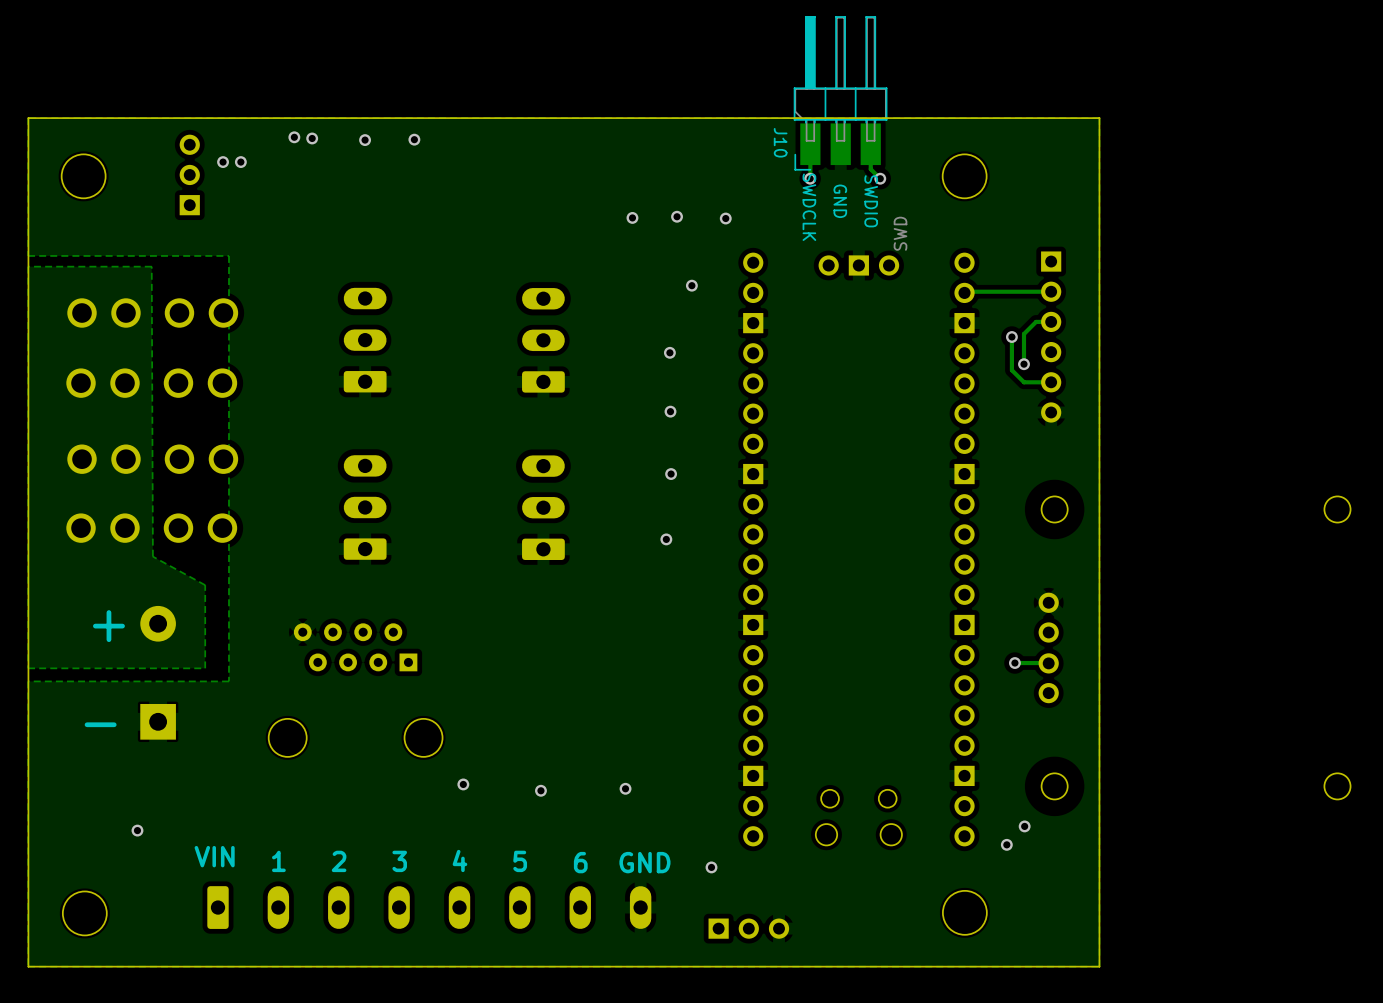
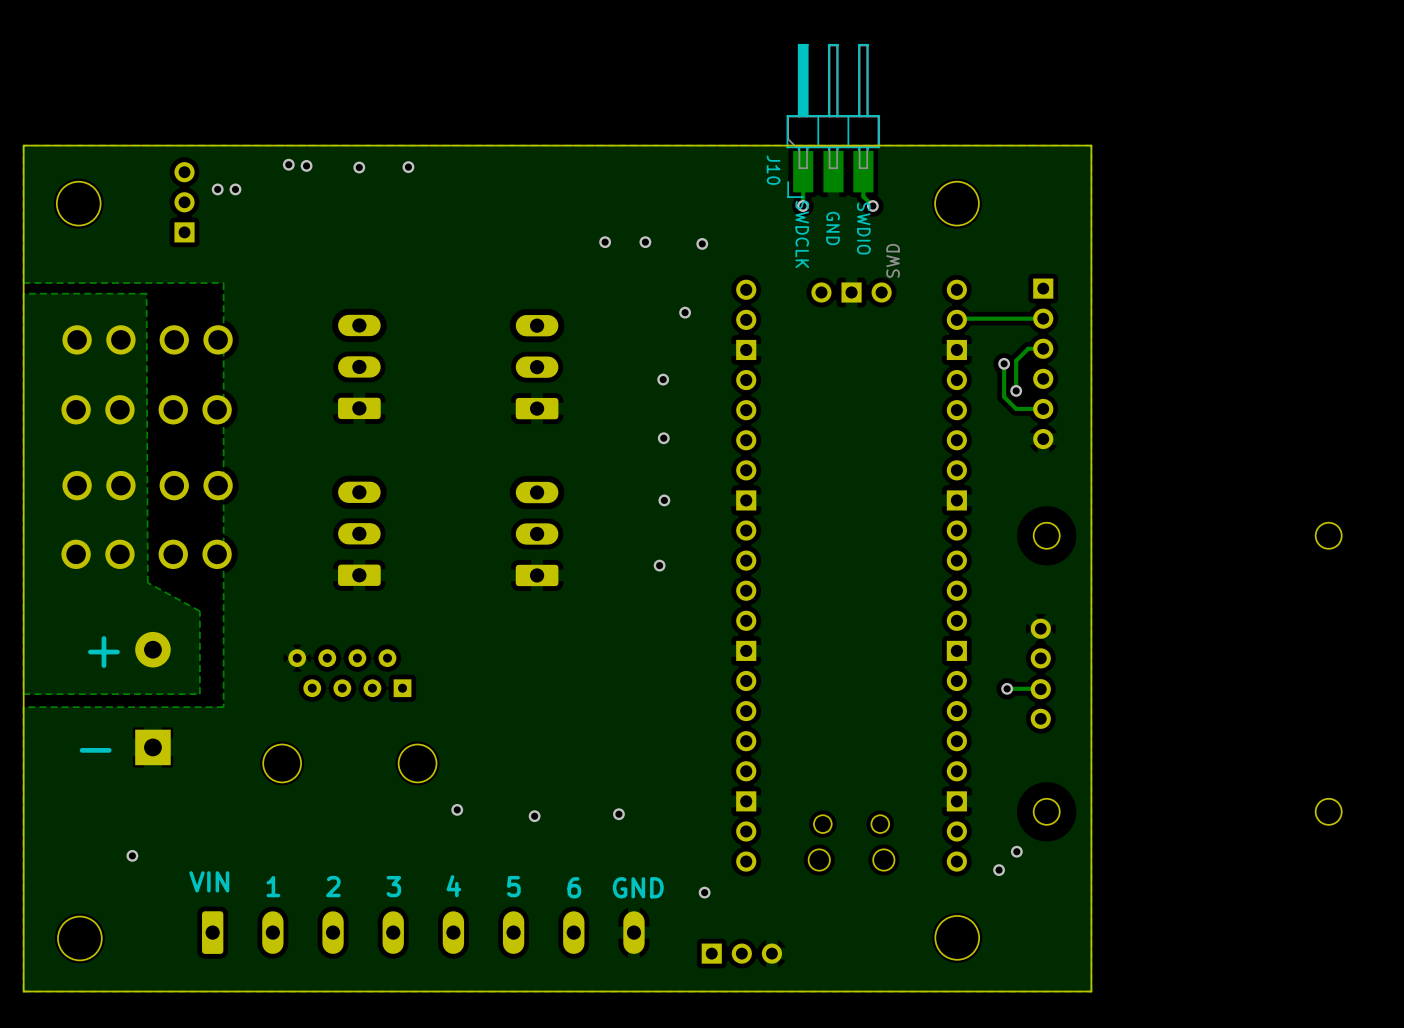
via: none -> (605, 242)
via: none -> (645, 242)
via: (677, 216) -> none
via: none -> (702, 243)
via: (632, 217) -> none
via: (725, 218) -> none

